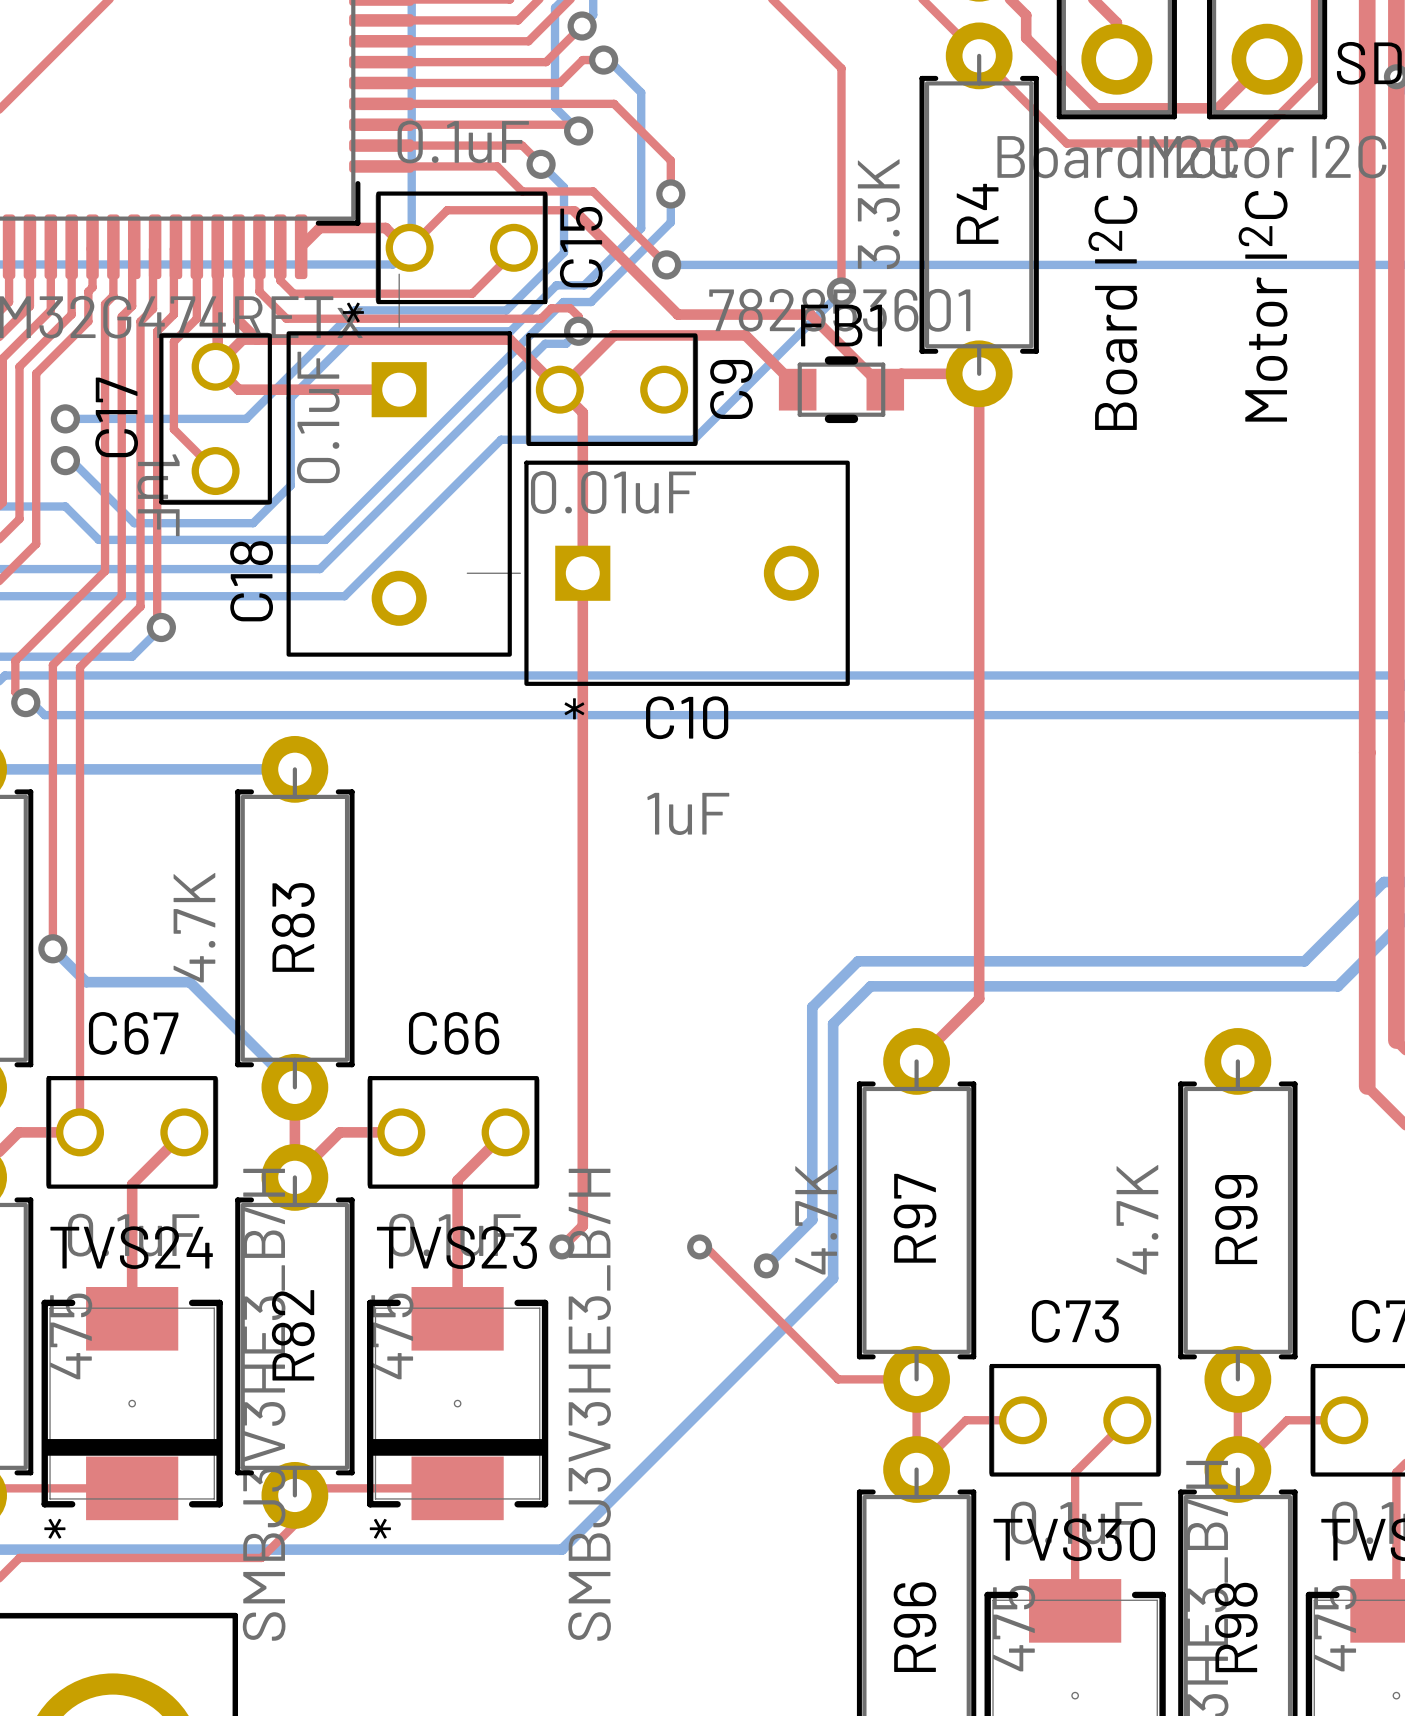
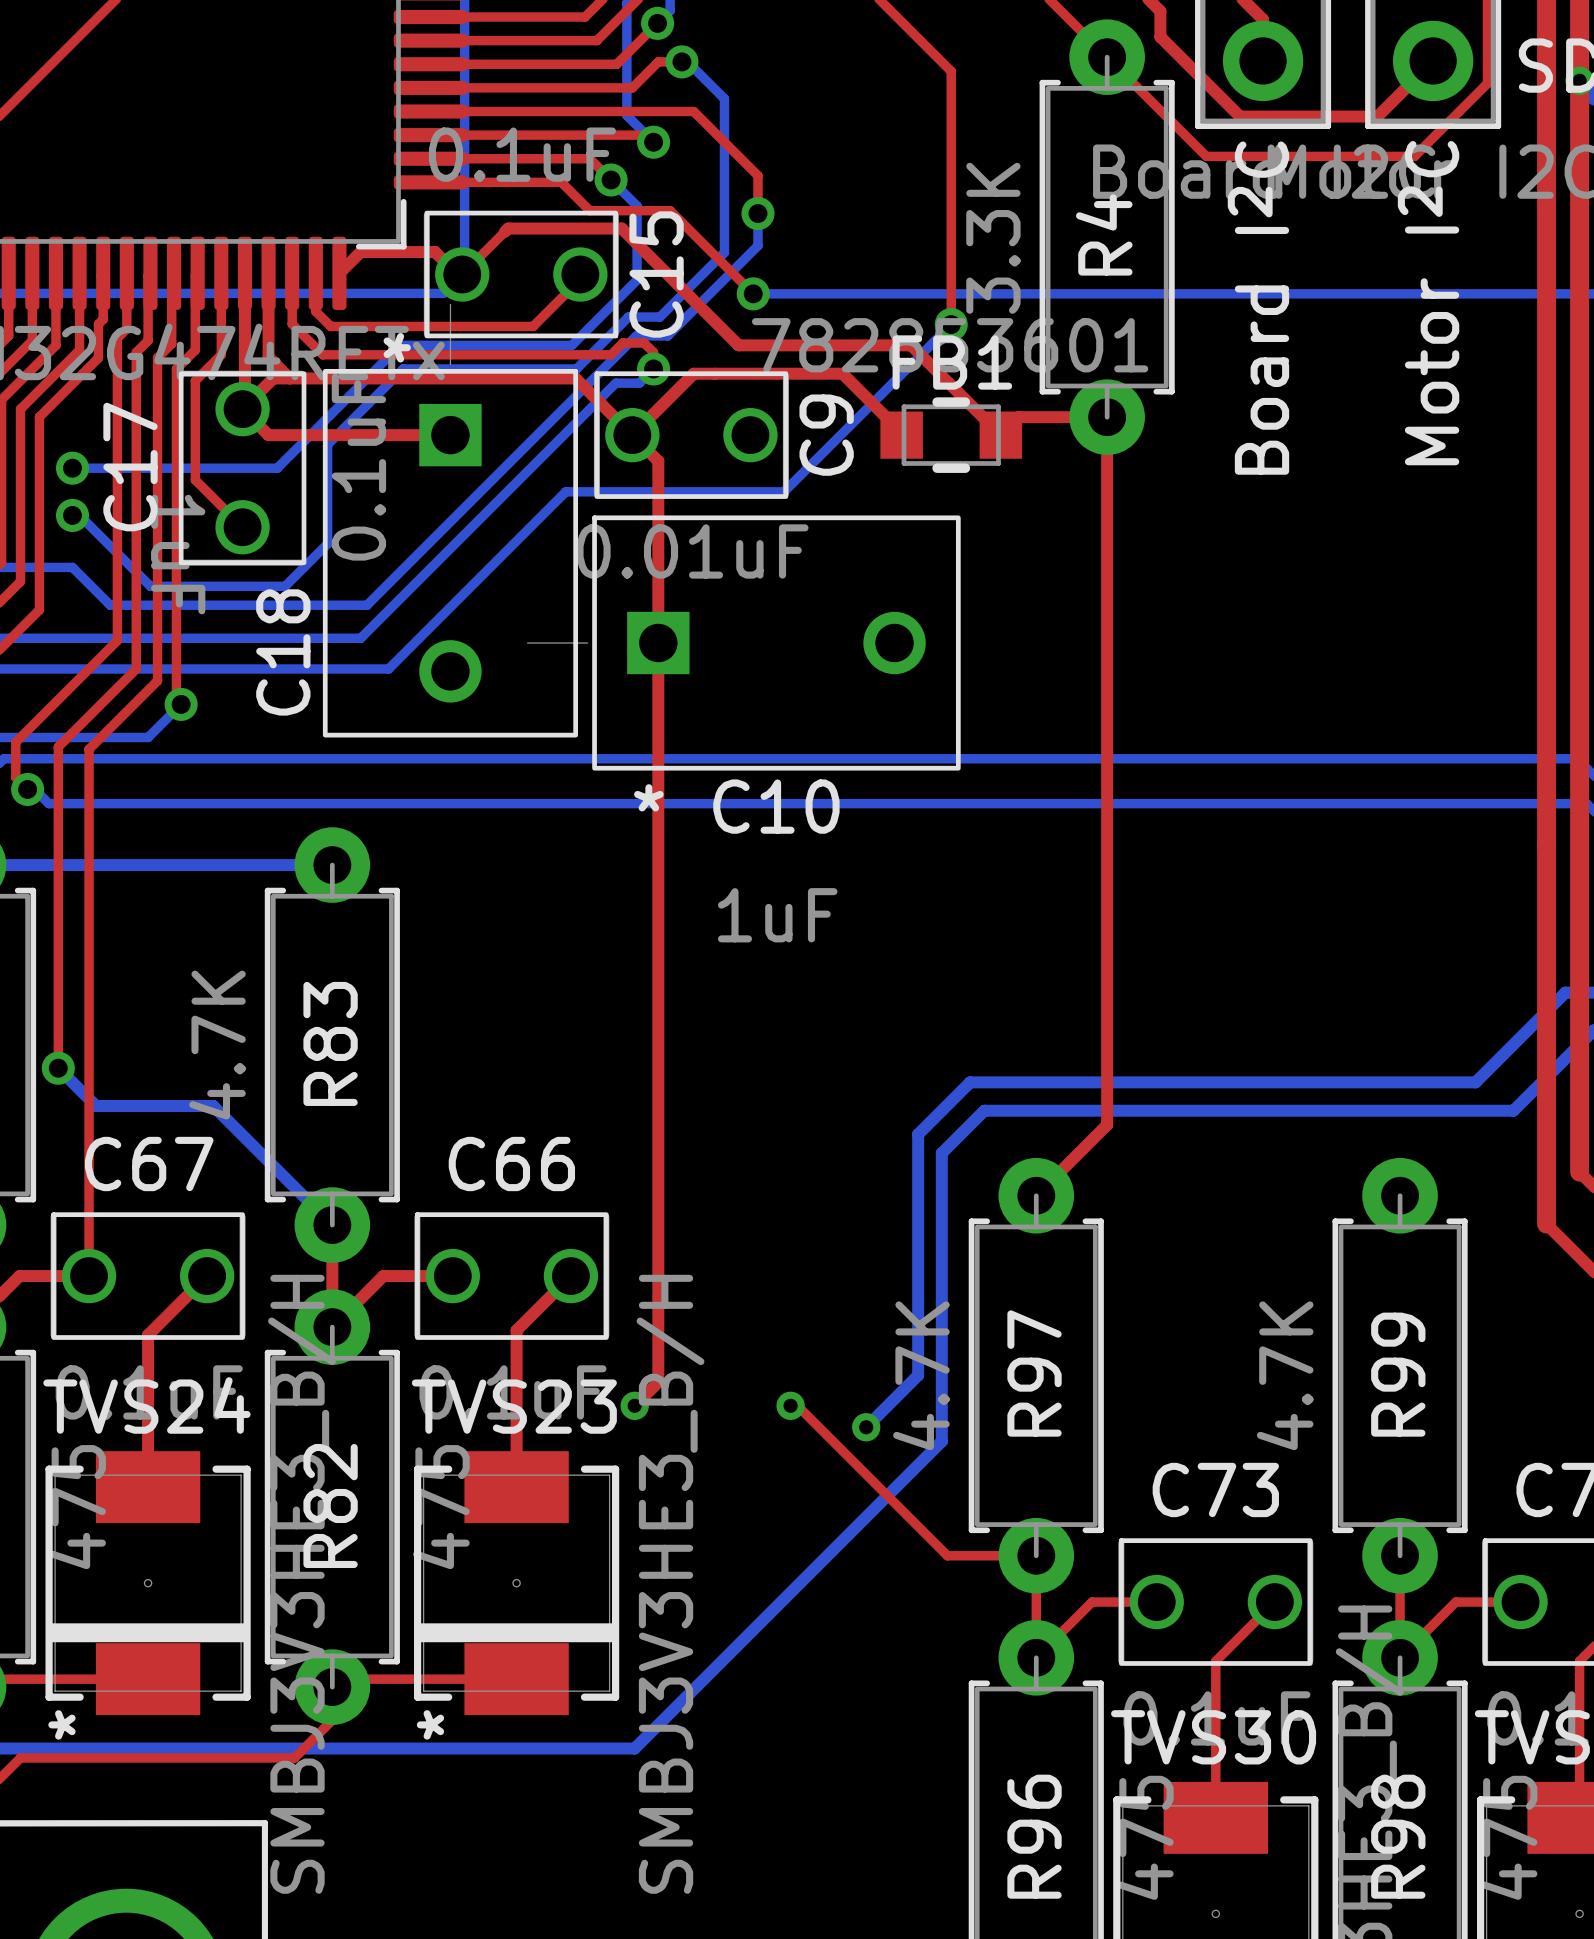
top track: (447, 210) (573, 210) (677, 314) (810, 314) -> (504, 231) (508, 228) (621, 228) (738, 345) (911, 345) (915, 350)

